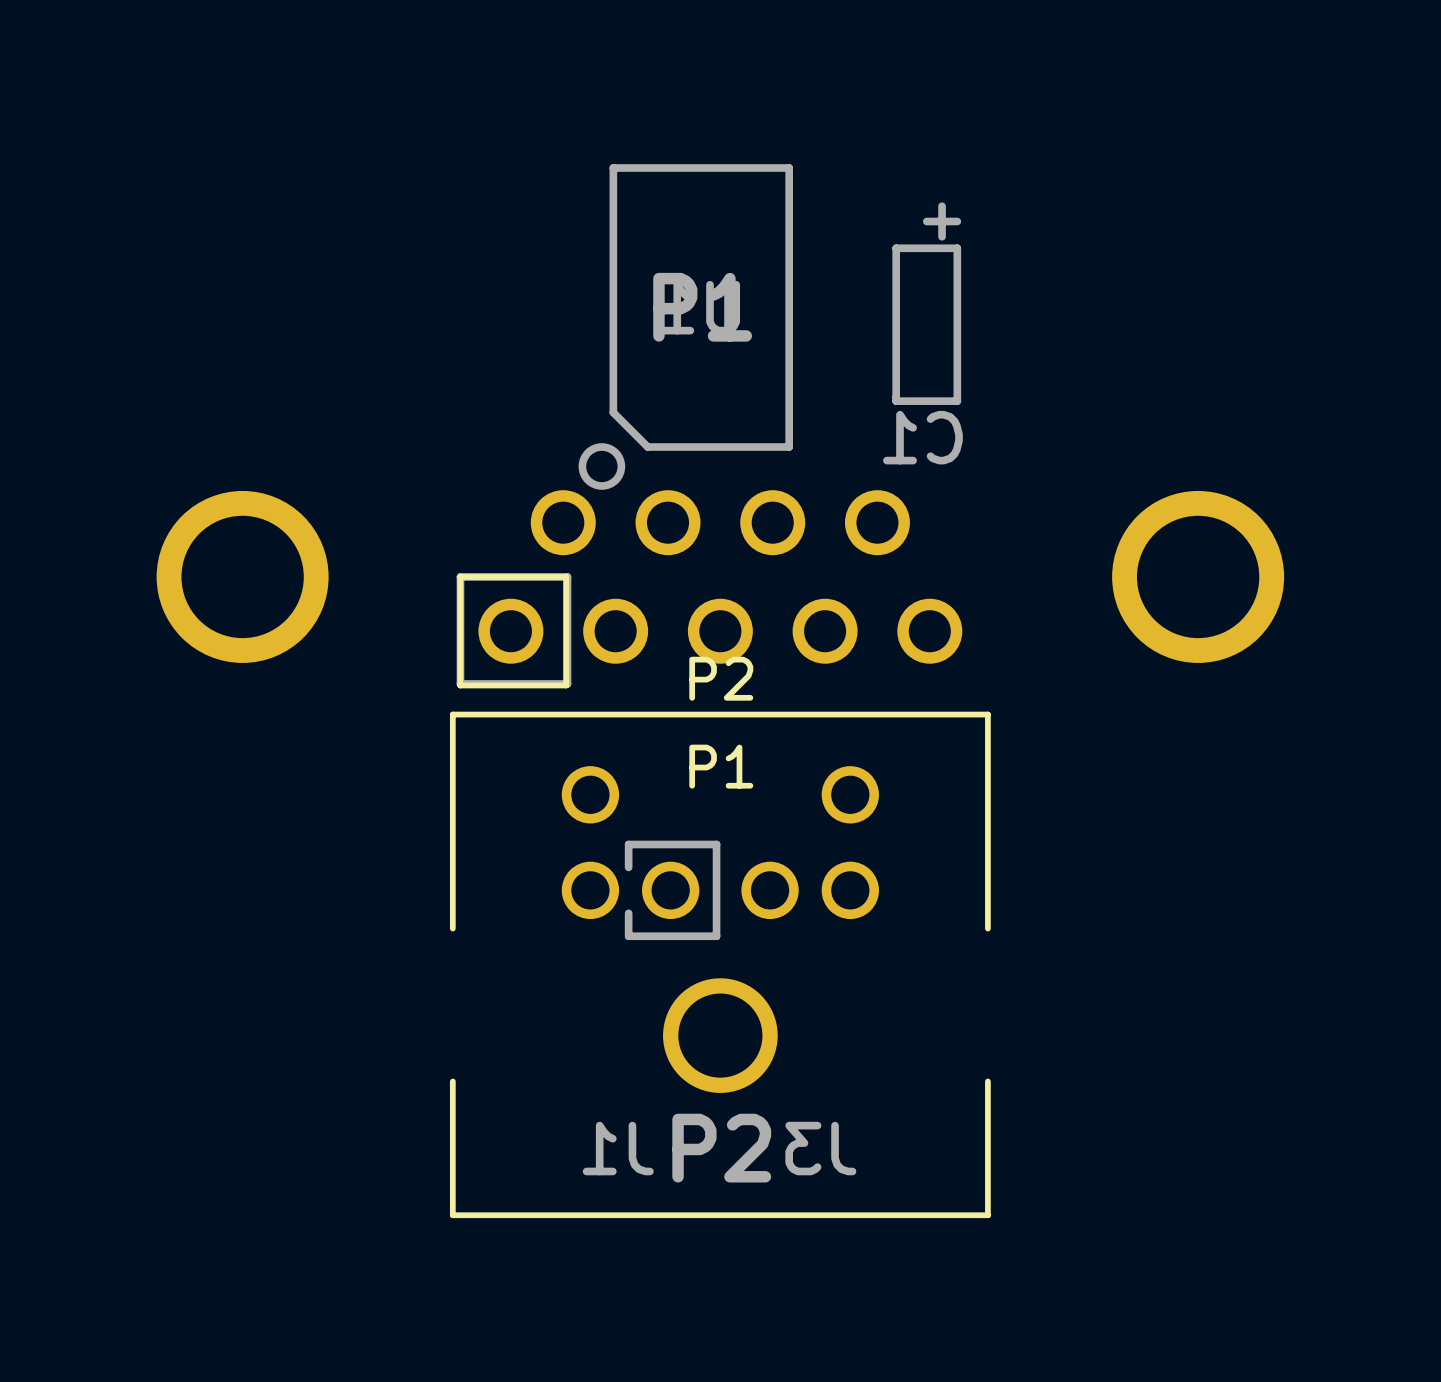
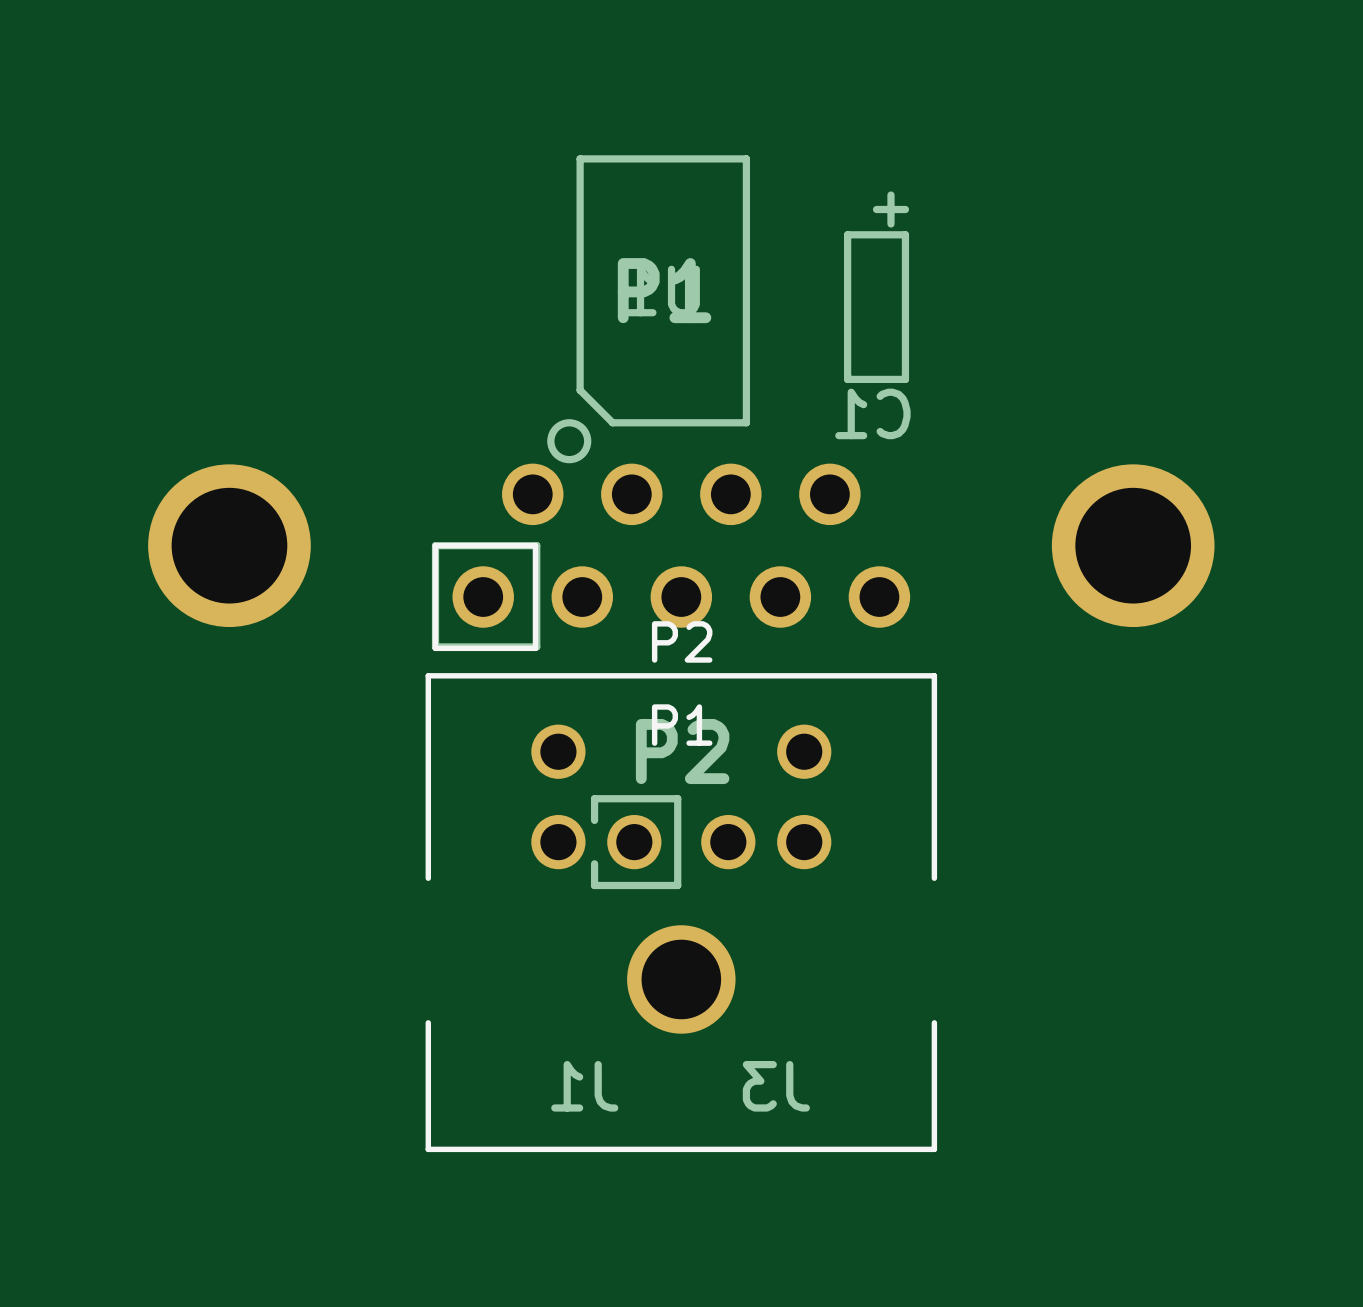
text position: P2 (721, 1148) -> P2 (682, 751)

